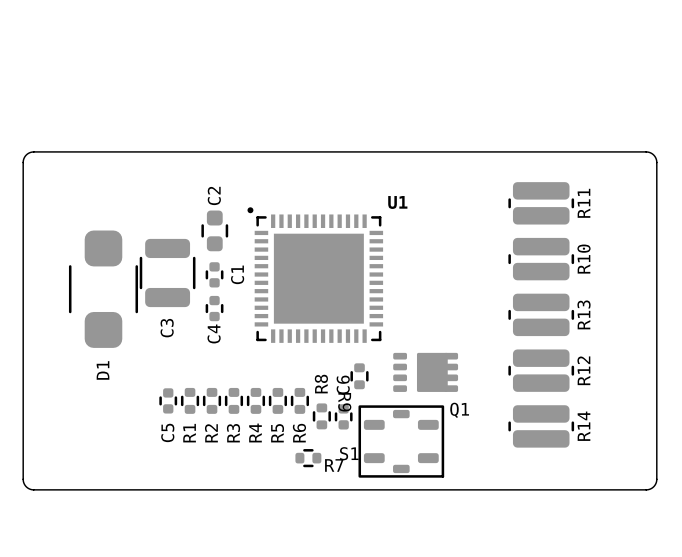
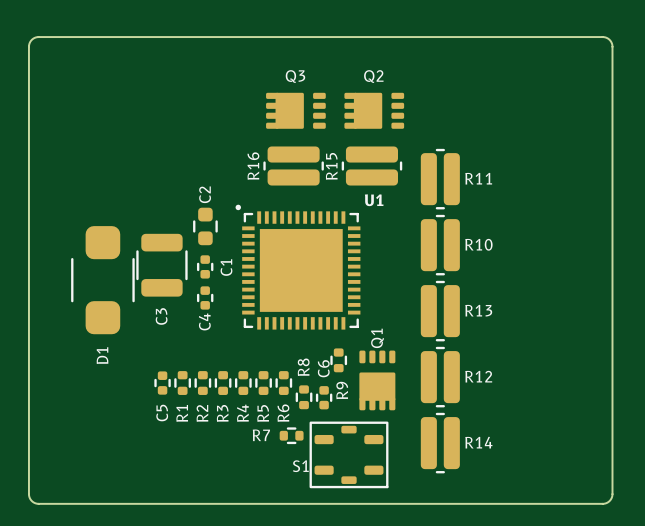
Q3: none -> (295, 110)
Q2: none -> (374, 110)
board edge: (23, 162) (26, 155) (33, 151) (646, 151) (653, 155) (656, 162) -> (28, 163) (29, 45) (32, 39) (38, 37) (604, 37) (609, 39) (612, 45) (612, 163)
R16: none -> (293, 166)
R15: none -> (371, 166)
R11 rotation: 0° (541, 203) -> 90° clockwise (440, 179)
R11 position: (541, 203) -> (440, 179)
R10 rotation: 0° (541, 259) -> 90° clockwise (440, 245)
R10 position: (541, 259) -> (440, 245)
R13 rotation: 0° (541, 314) -> 90° clockwise (440, 311)
R13 position: (541, 314) -> (440, 311)
R12 rotation: 0° (541, 370) -> 90° clockwise (440, 377)
R12 position: (541, 370) -> (440, 377)
Q1 rotation: 0° (425, 372) -> 90° clockwise (377, 380)
R9 name rotation: 0° (344, 402) -> 180° (342, 390)
Q1 name position: Q1 (459, 410) -> Q1 (377, 338)
R14 rotation: 0° (541, 426) -> 90° clockwise (440, 443)
R14 position: (541, 426) -> (440, 443)
S1 position: (401, 441) -> (349, 454)
R7 name position: R7 (334, 465) -> R7 (261, 435)
board edge: (23, 479) (26, 486) (33, 489) (646, 489) (653, 486) (656, 479) -> (28, 455) (29, 496) (32, 501) (38, 503) (603, 503) (609, 501) (612, 496) (612, 455)

